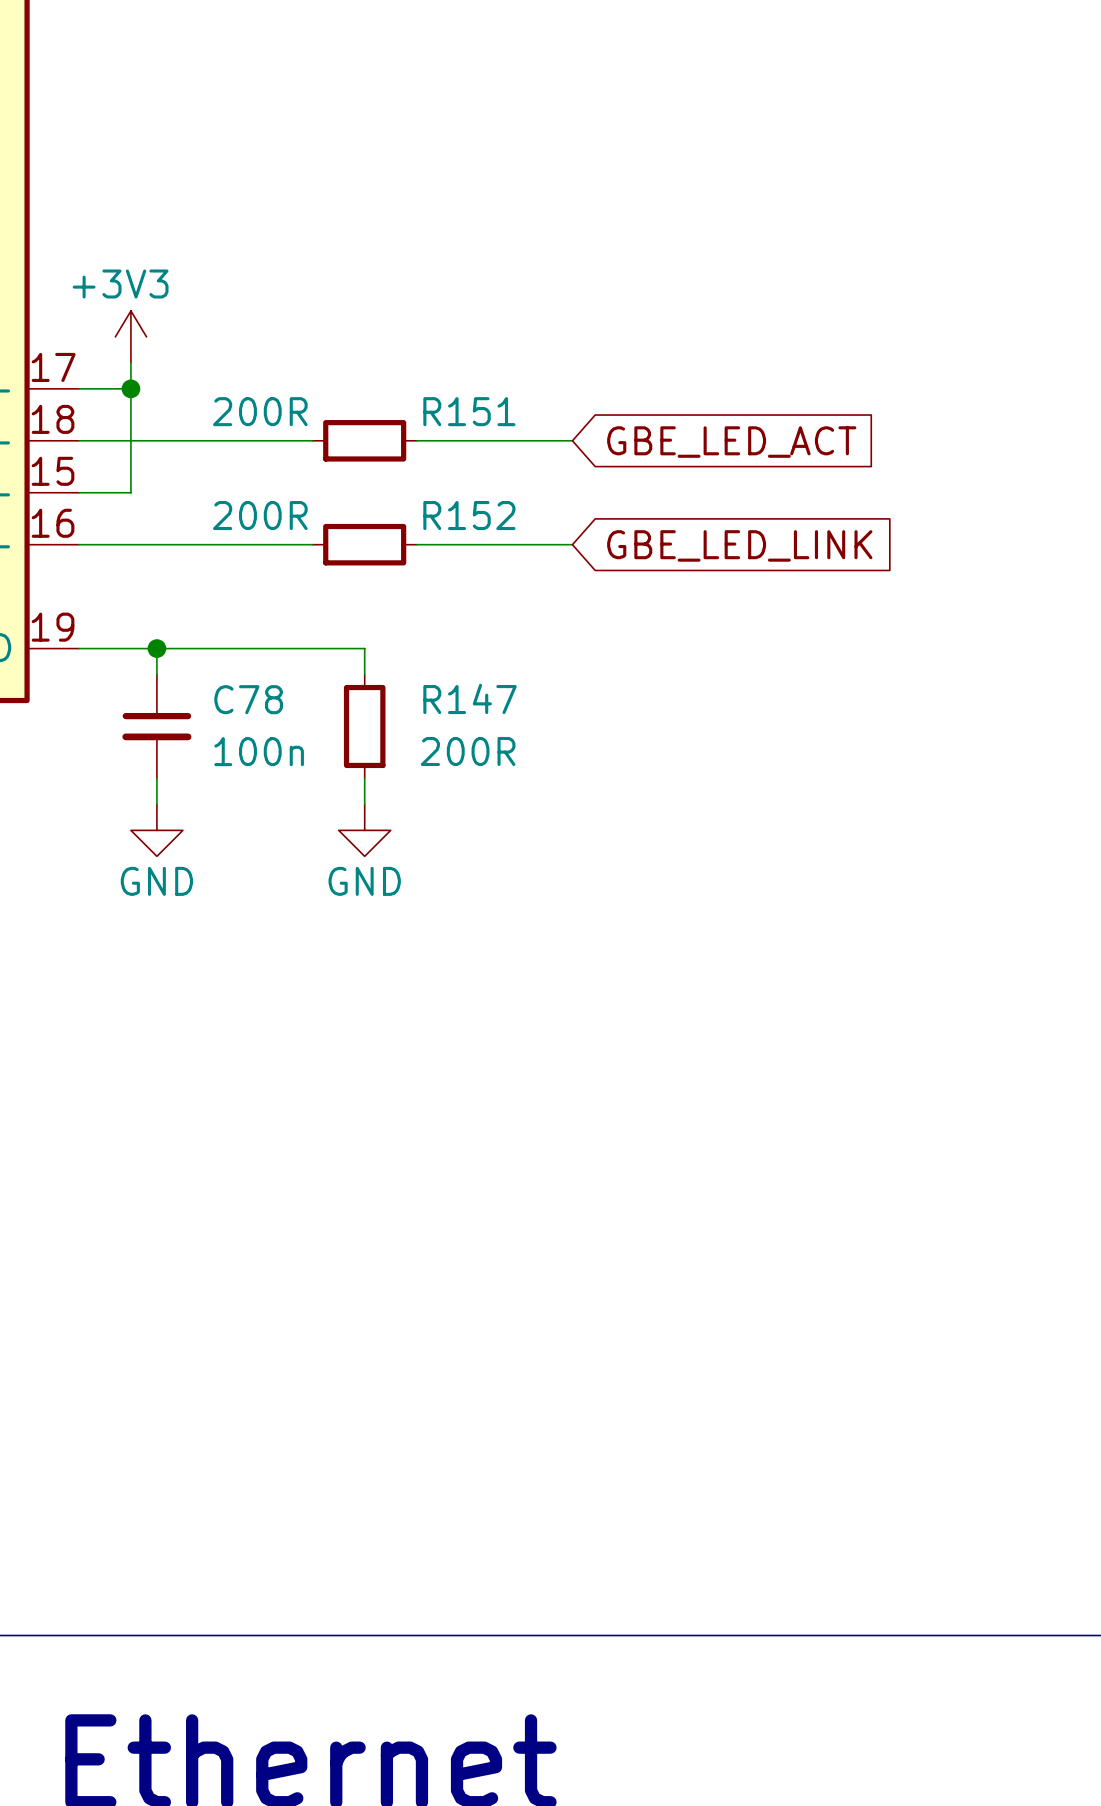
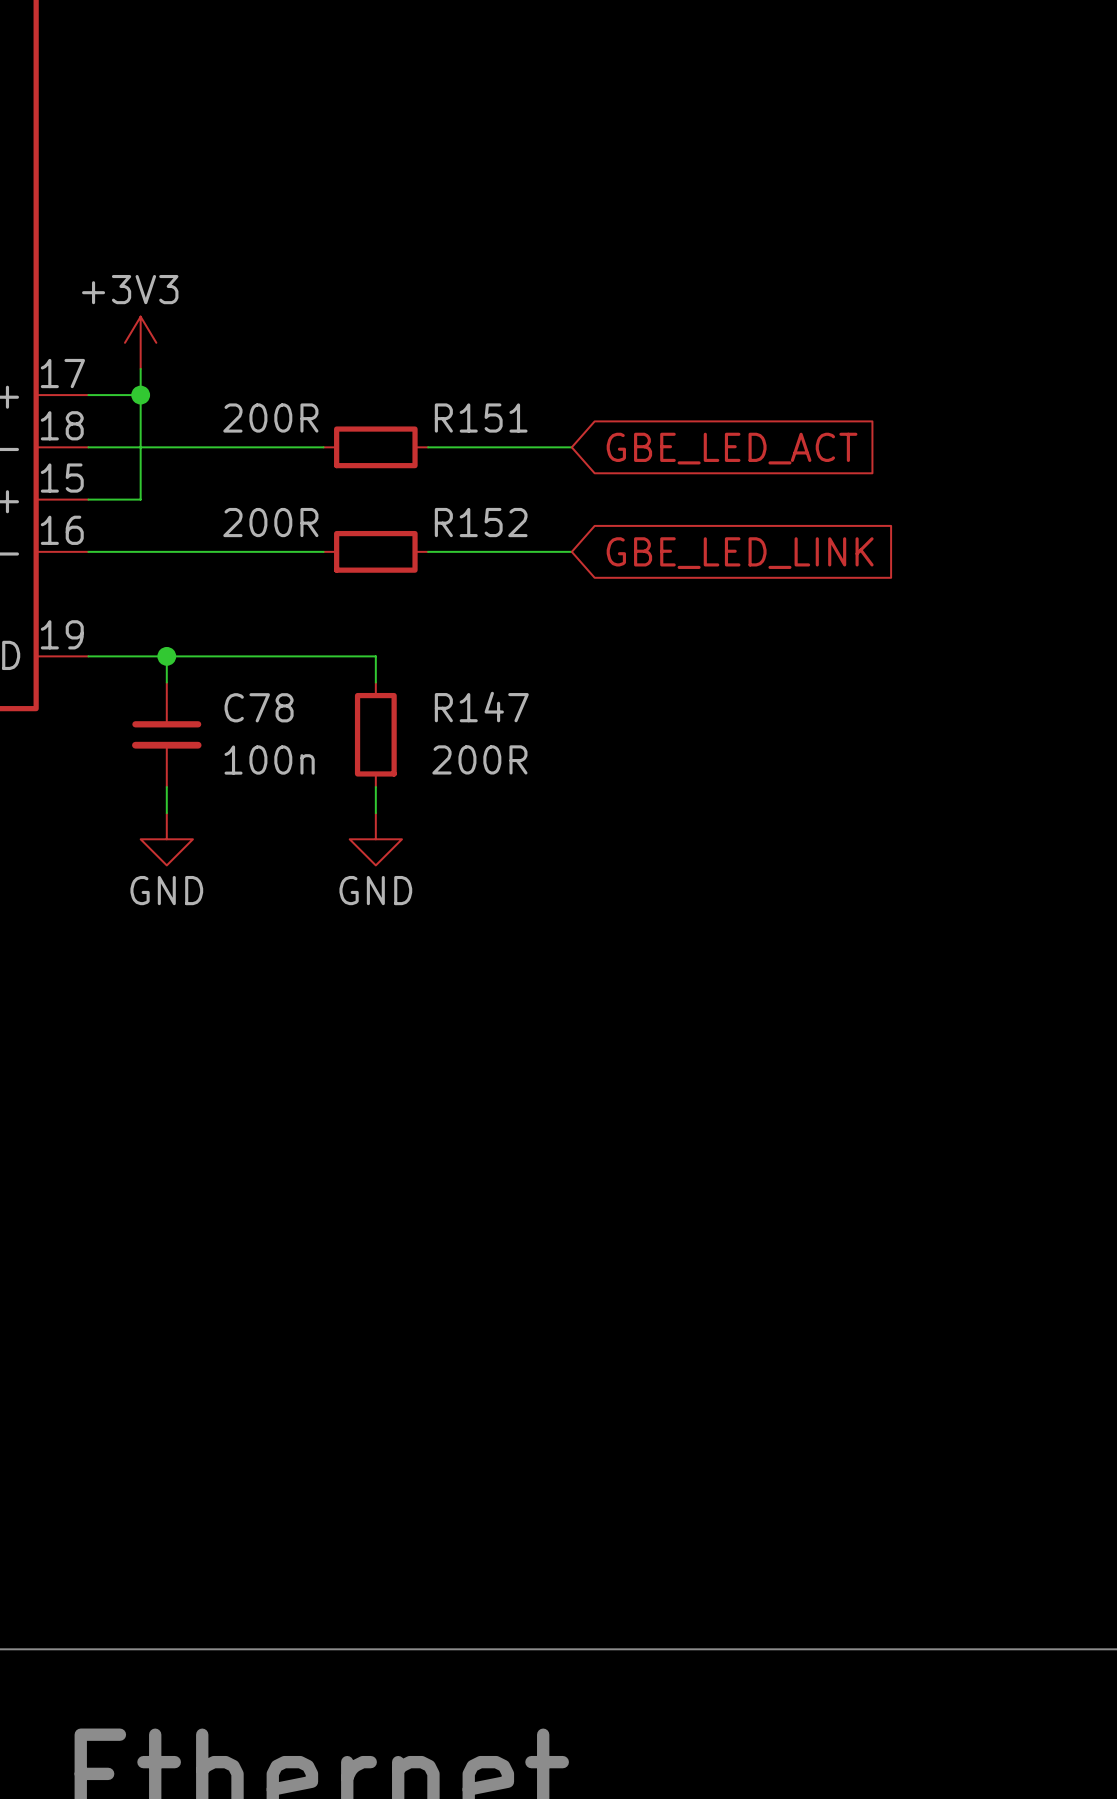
wire: (559, 440) (572, 440) -> none
global label position: GBE_LED_ACT (731, 442) -> GBE_LED_ACT (732, 448)
wire: (559, 544) (572, 544) -> none
global label position: GBE_LED_LINK (739, 545) -> GBE_LED_LINK (740, 553)

